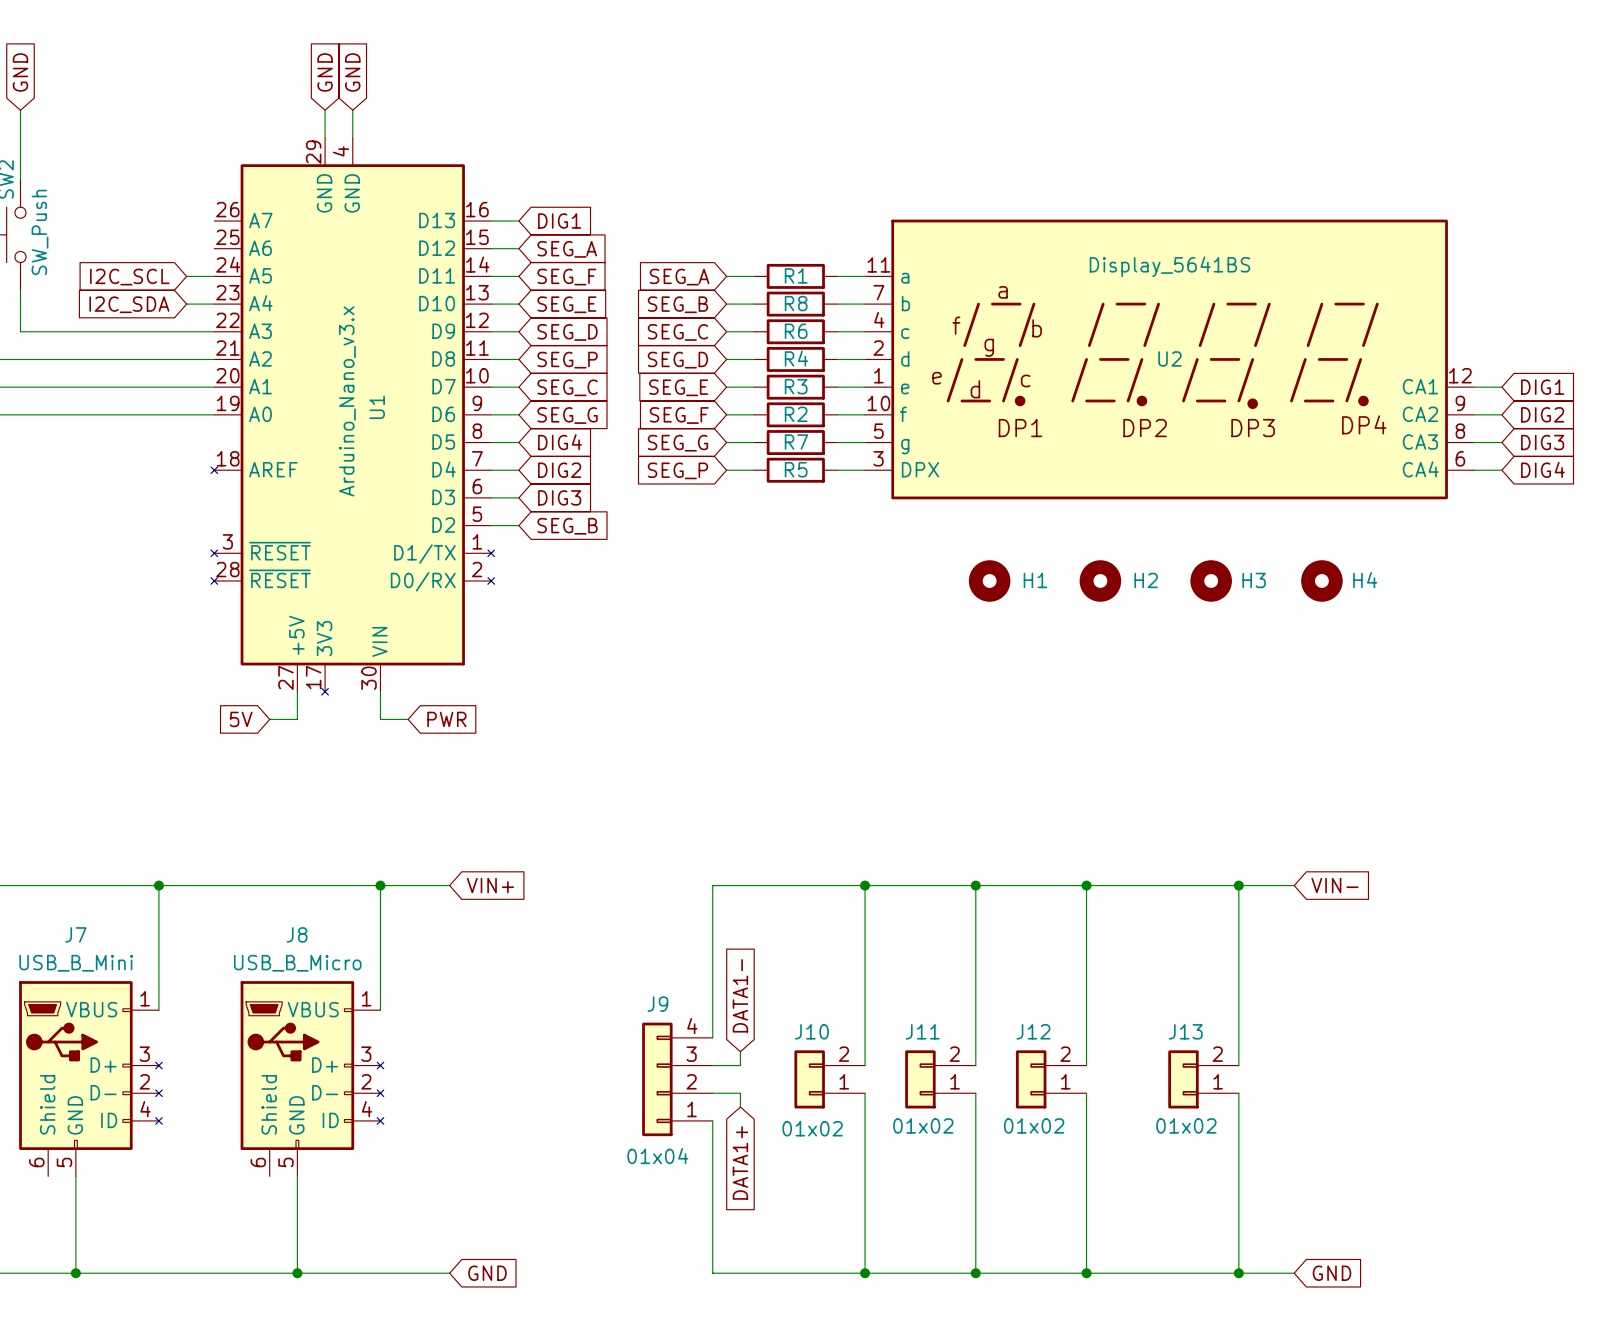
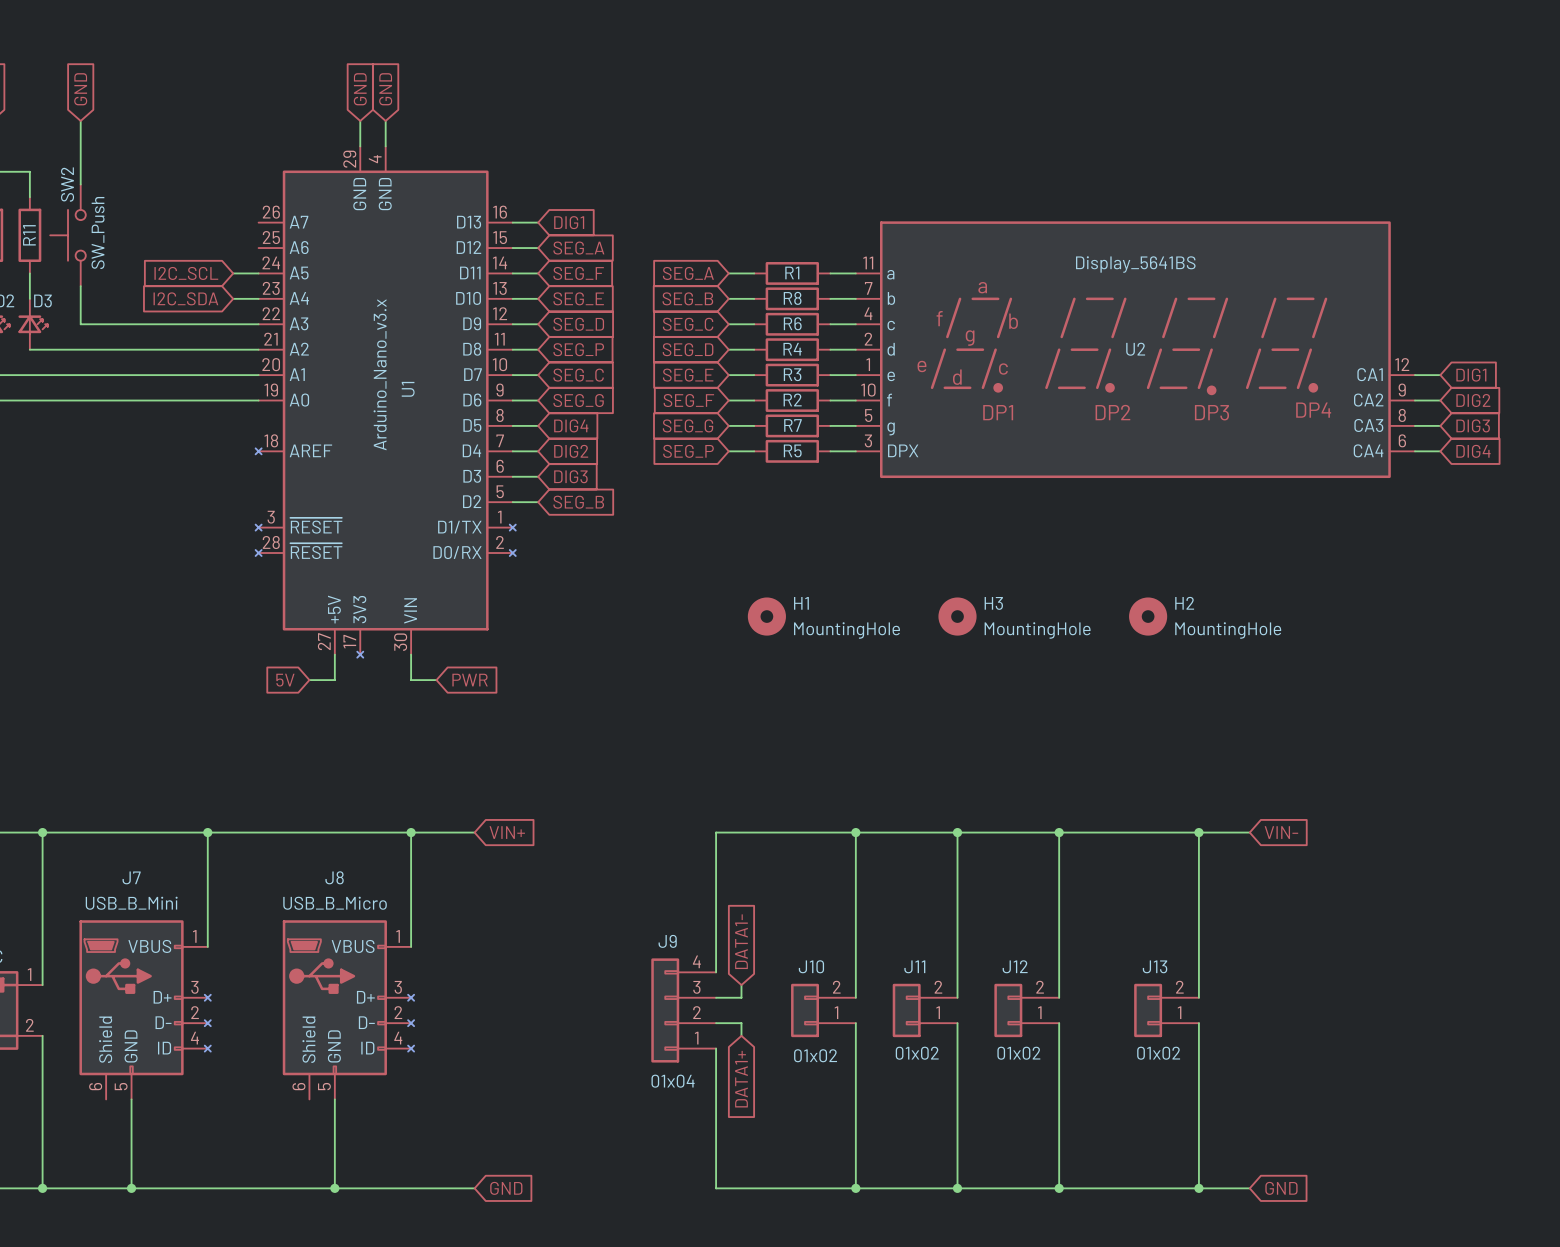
H1 position: (989, 580) -> (766, 616)
H1 name position: H1 (1035, 580) -> H1 (801, 603)
H2 position: (1100, 580) -> (1148, 616)
H2 name position: H2 (1146, 580) -> H2 (1184, 603)
H3 position: (1211, 580) -> (957, 616)
H3 name position: H3 (1254, 580) -> H3 (993, 603)
H4: (1321, 580) -> none
H1 value: none -> MountingHole (846, 630)
H3 value: none -> MountingHole (1037, 630)
H2 value: none -> MountingHole (1228, 630)

